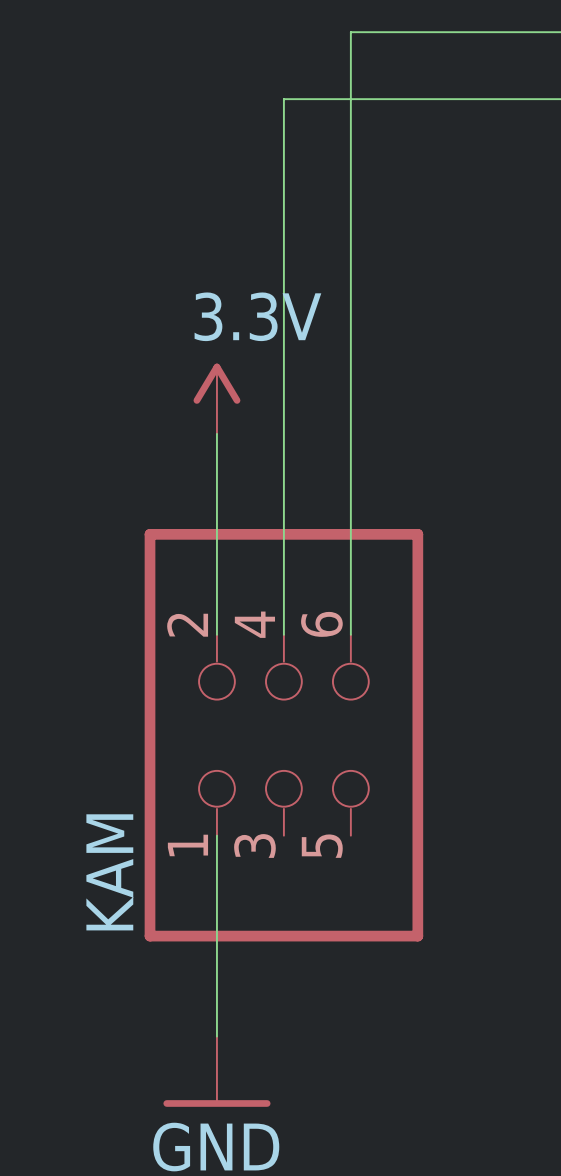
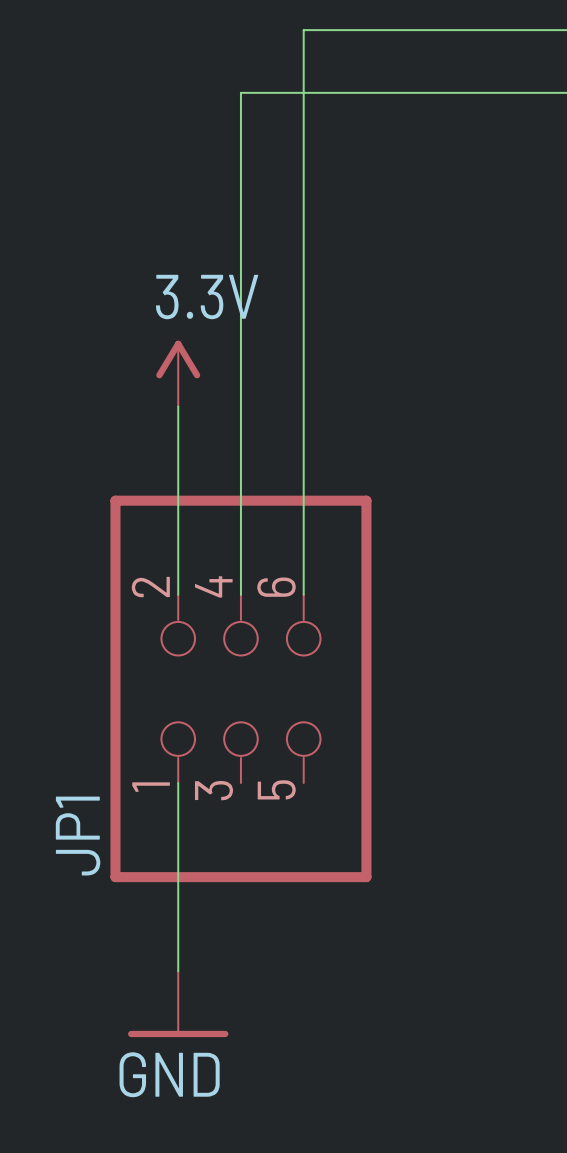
KAM name: KAM (109, 872) -> JP1 (78, 836)

